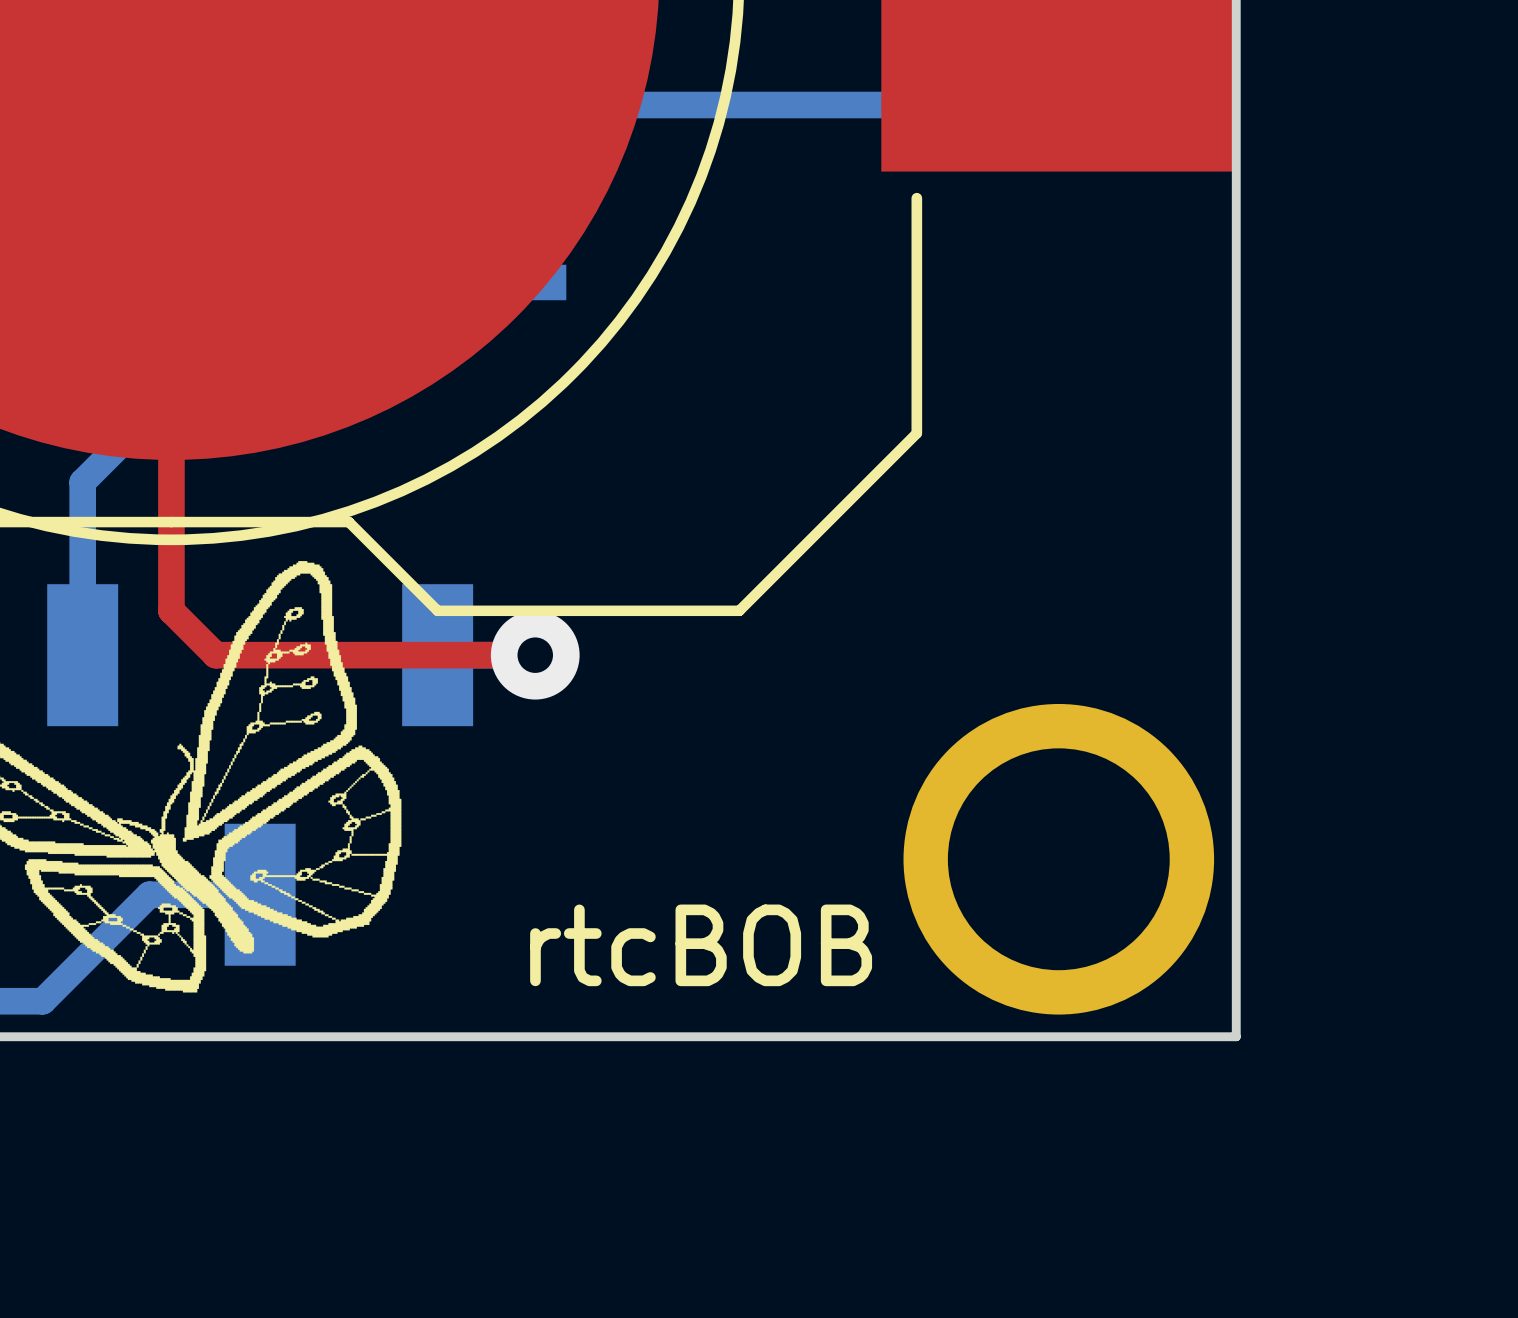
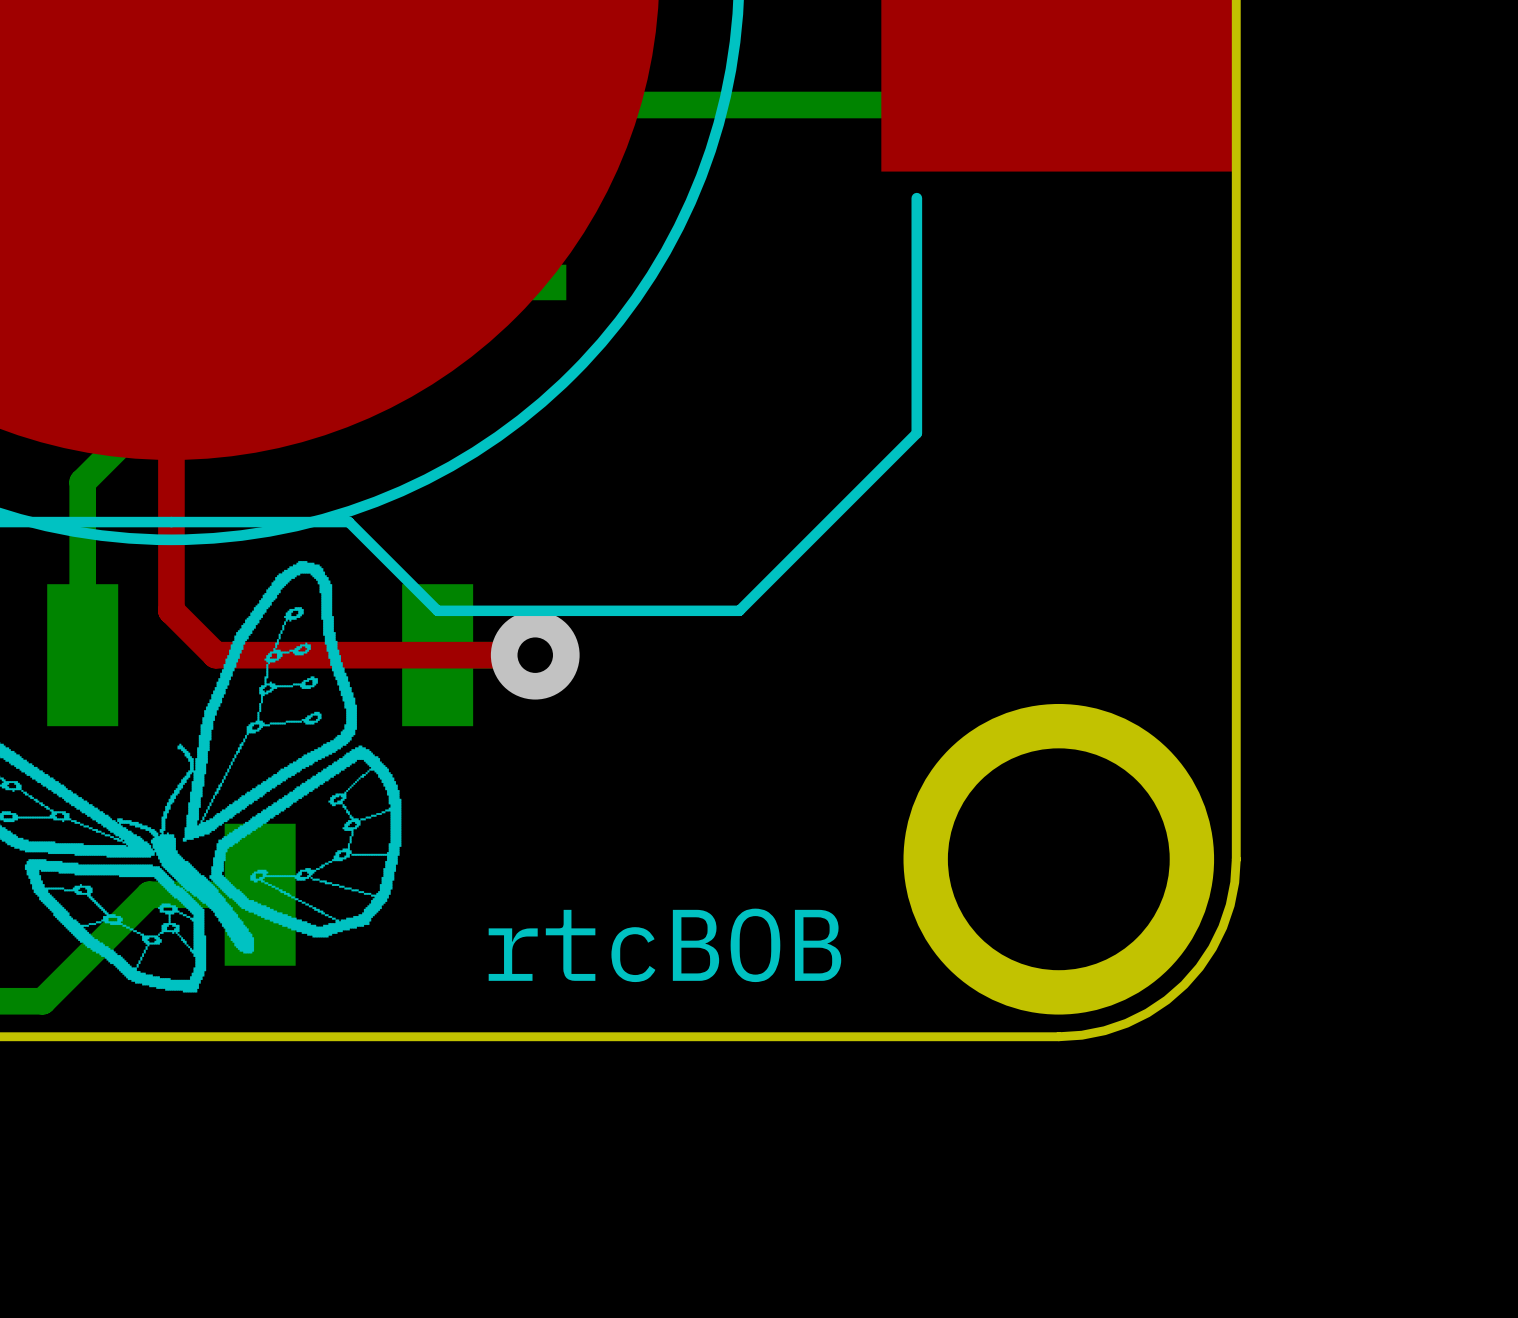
board edge: (1236, 859) (1236, 1036) (1058, 1036) -> (1236, 859) (1234, 882) (1230, 905) (1222, 927) (1212, 948) (1199, 967) (1184, 984) (1166, 1000) (1147, 1012) (1126, 1023) (1104, 1030) (1081, 1035) (1058, 1036)
text position: rtcBOB (701, 945) -> rtcBOB (664, 945)

